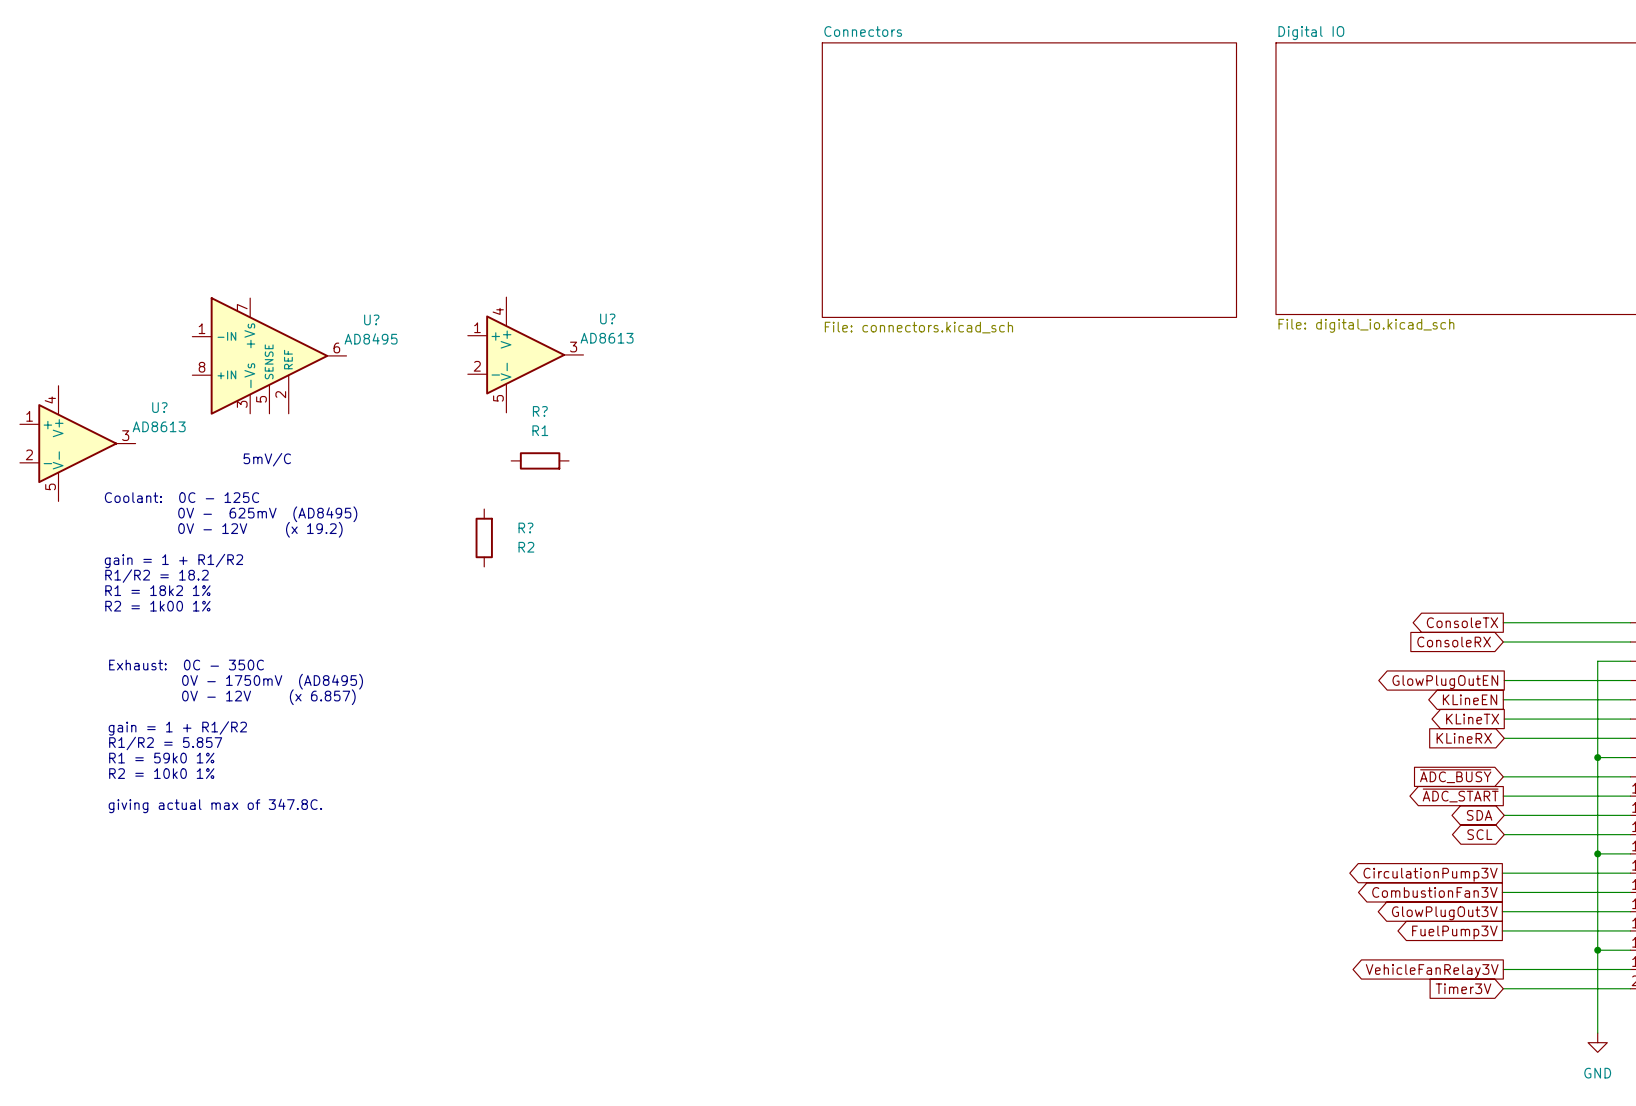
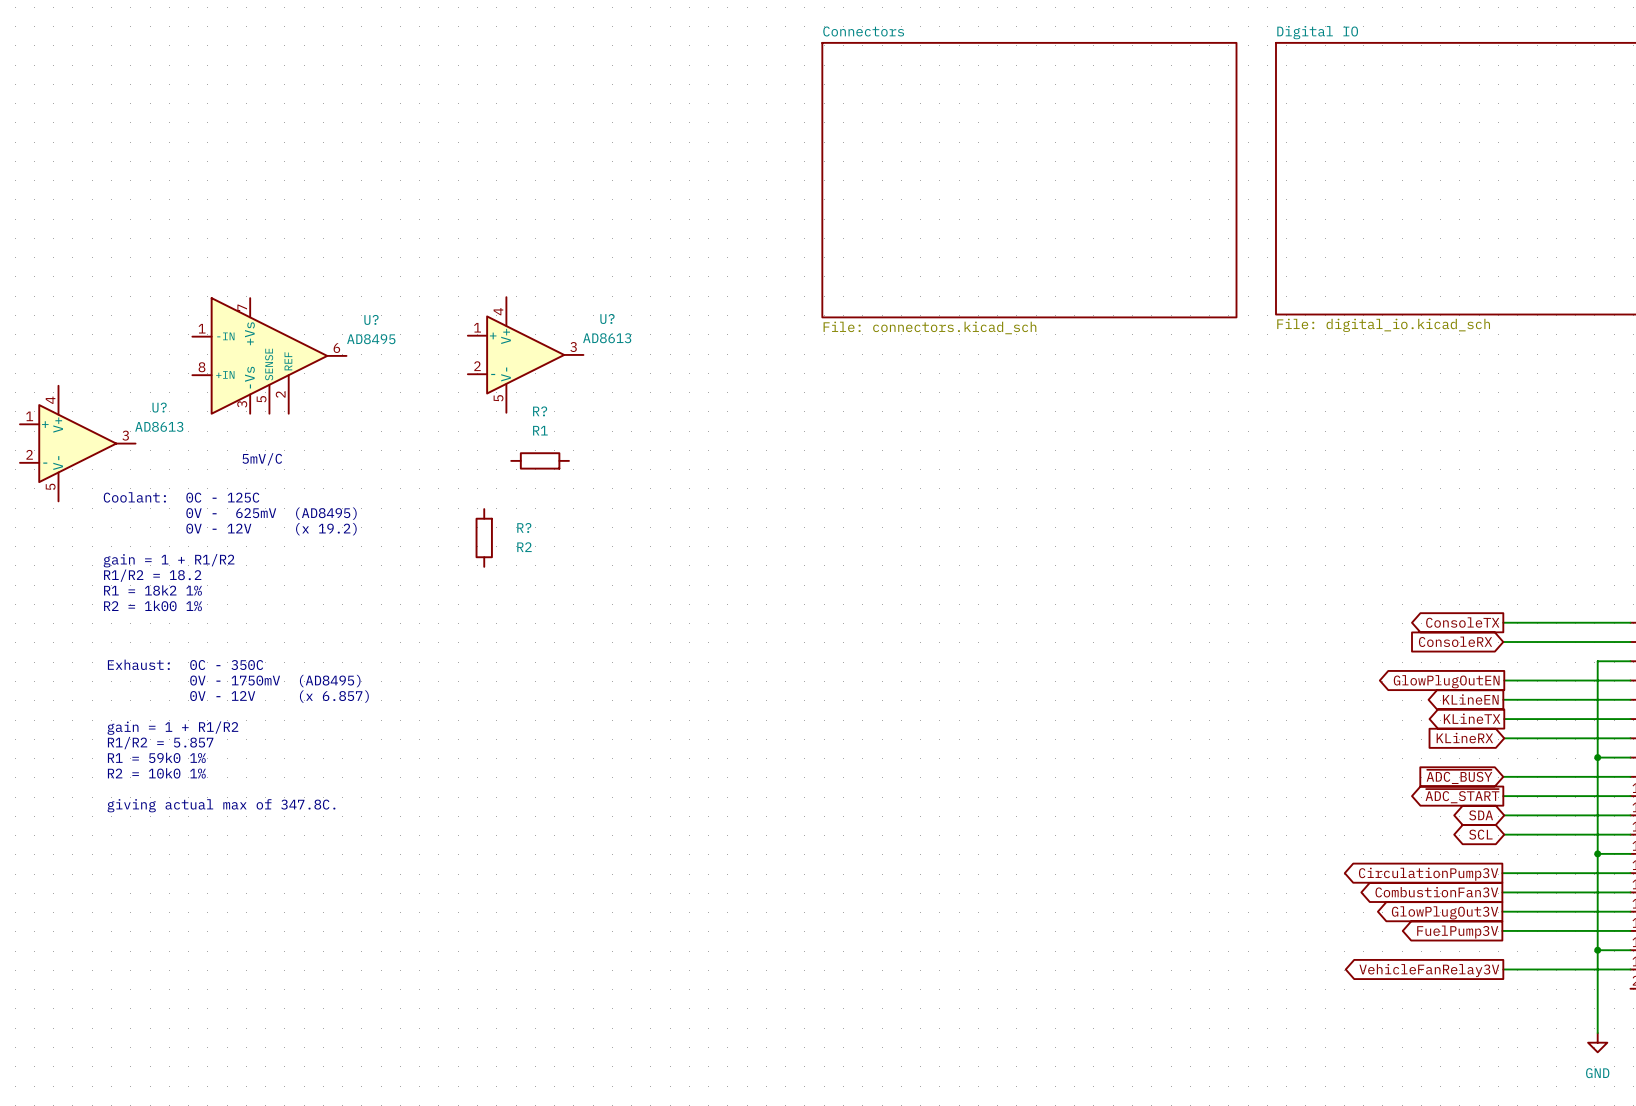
global label: Timer3V (1463, 988) -> none
wire: (1503, 988) (1630, 988) -> none

